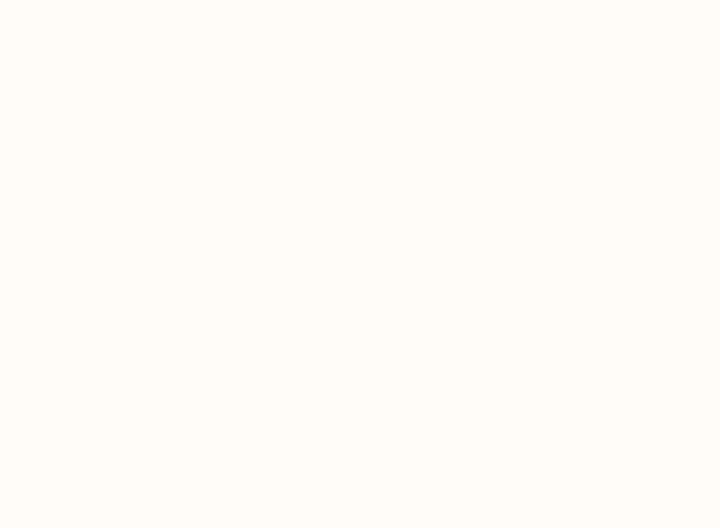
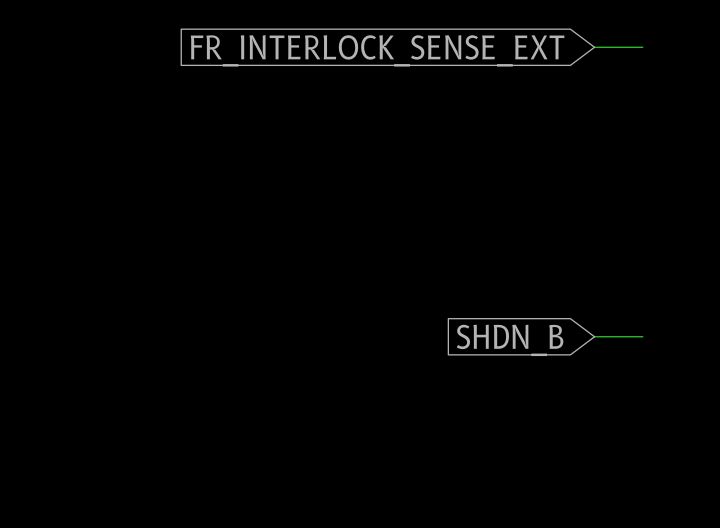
wire: none -> (594, 47) (642, 47)
global label: none -> FR_INTERLOCK_SENSE_EXT (377, 50)
wire: none -> (594, 336) (642, 336)
global label: none -> SHDN_B (510, 340)

